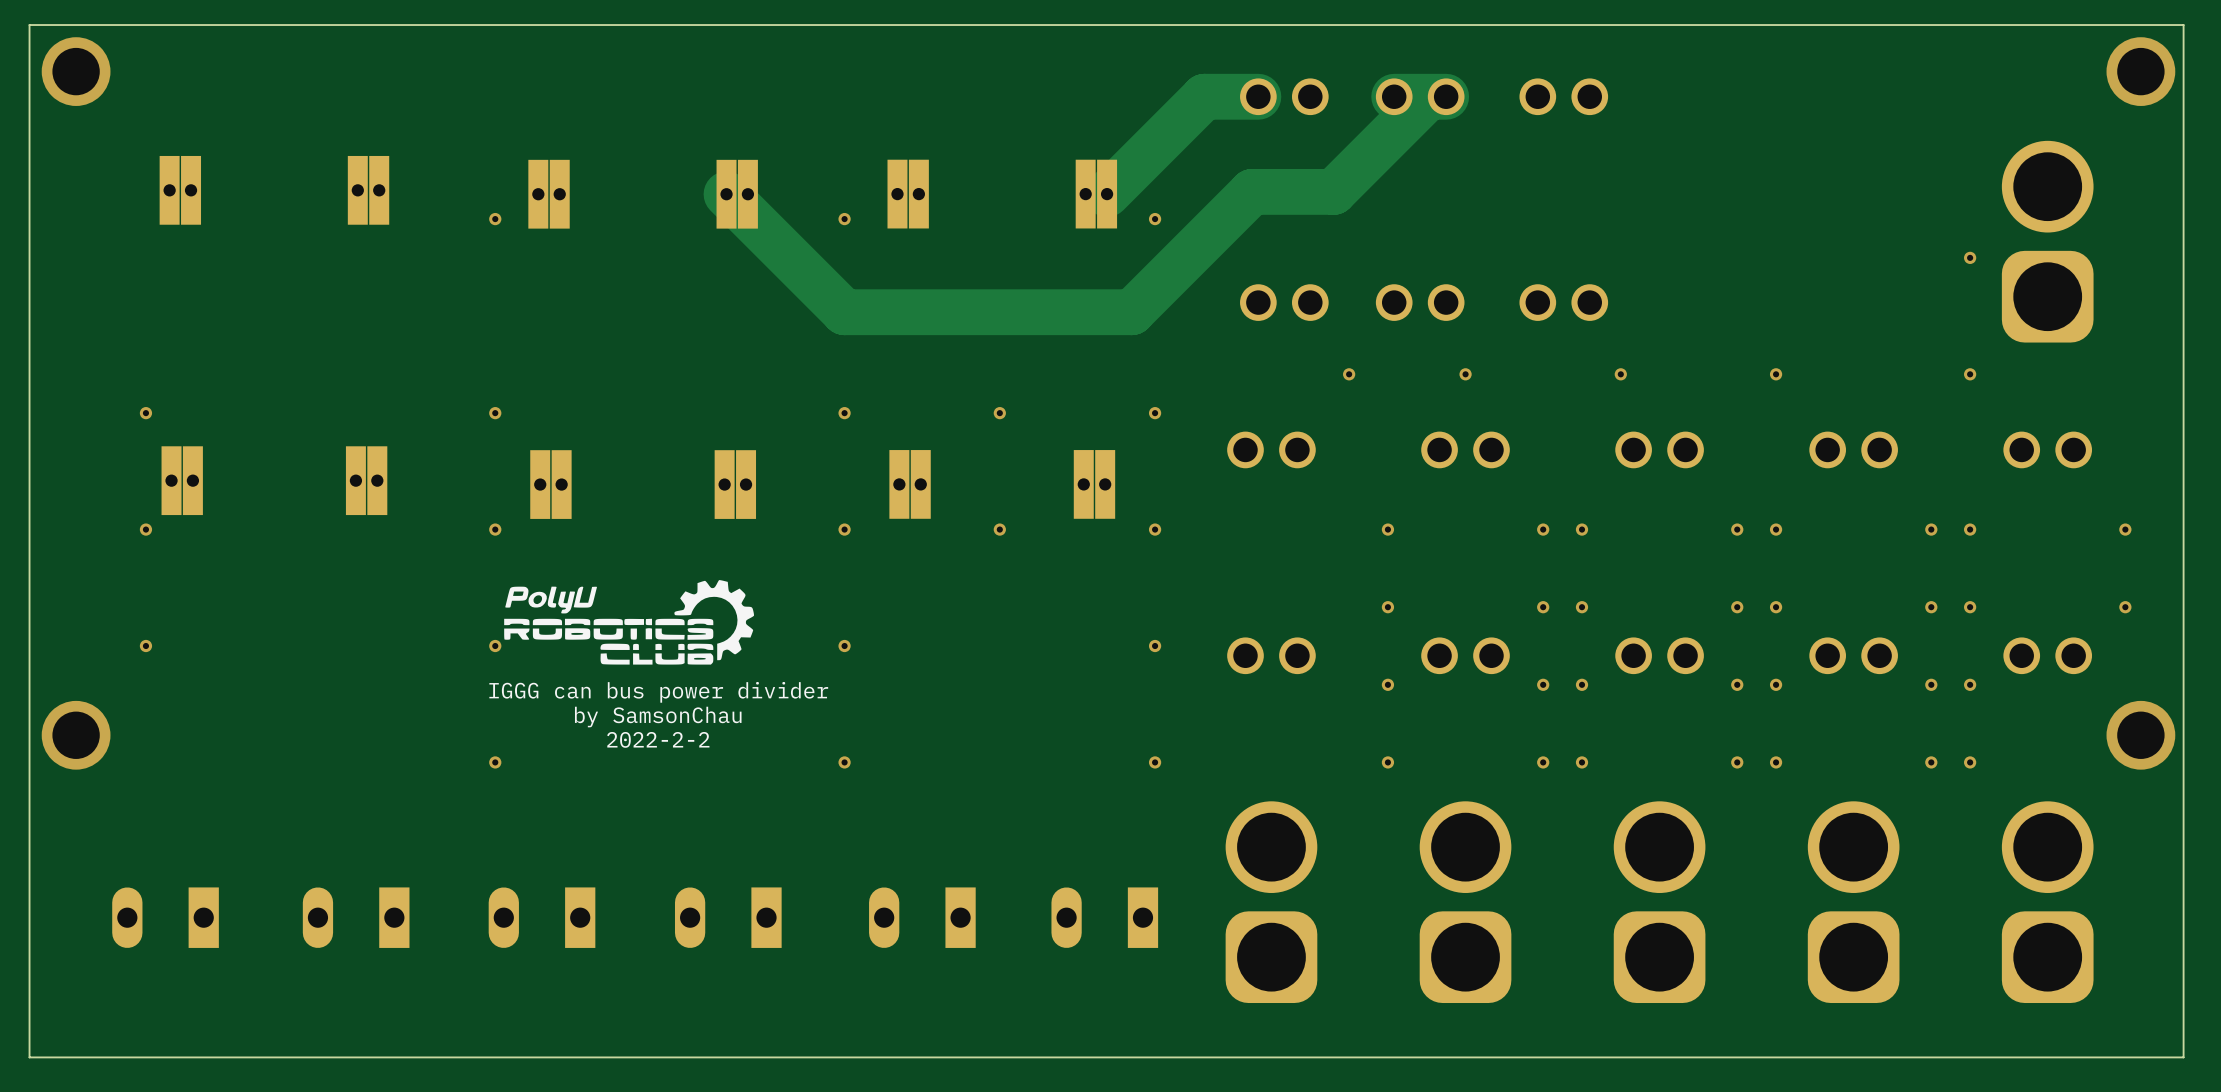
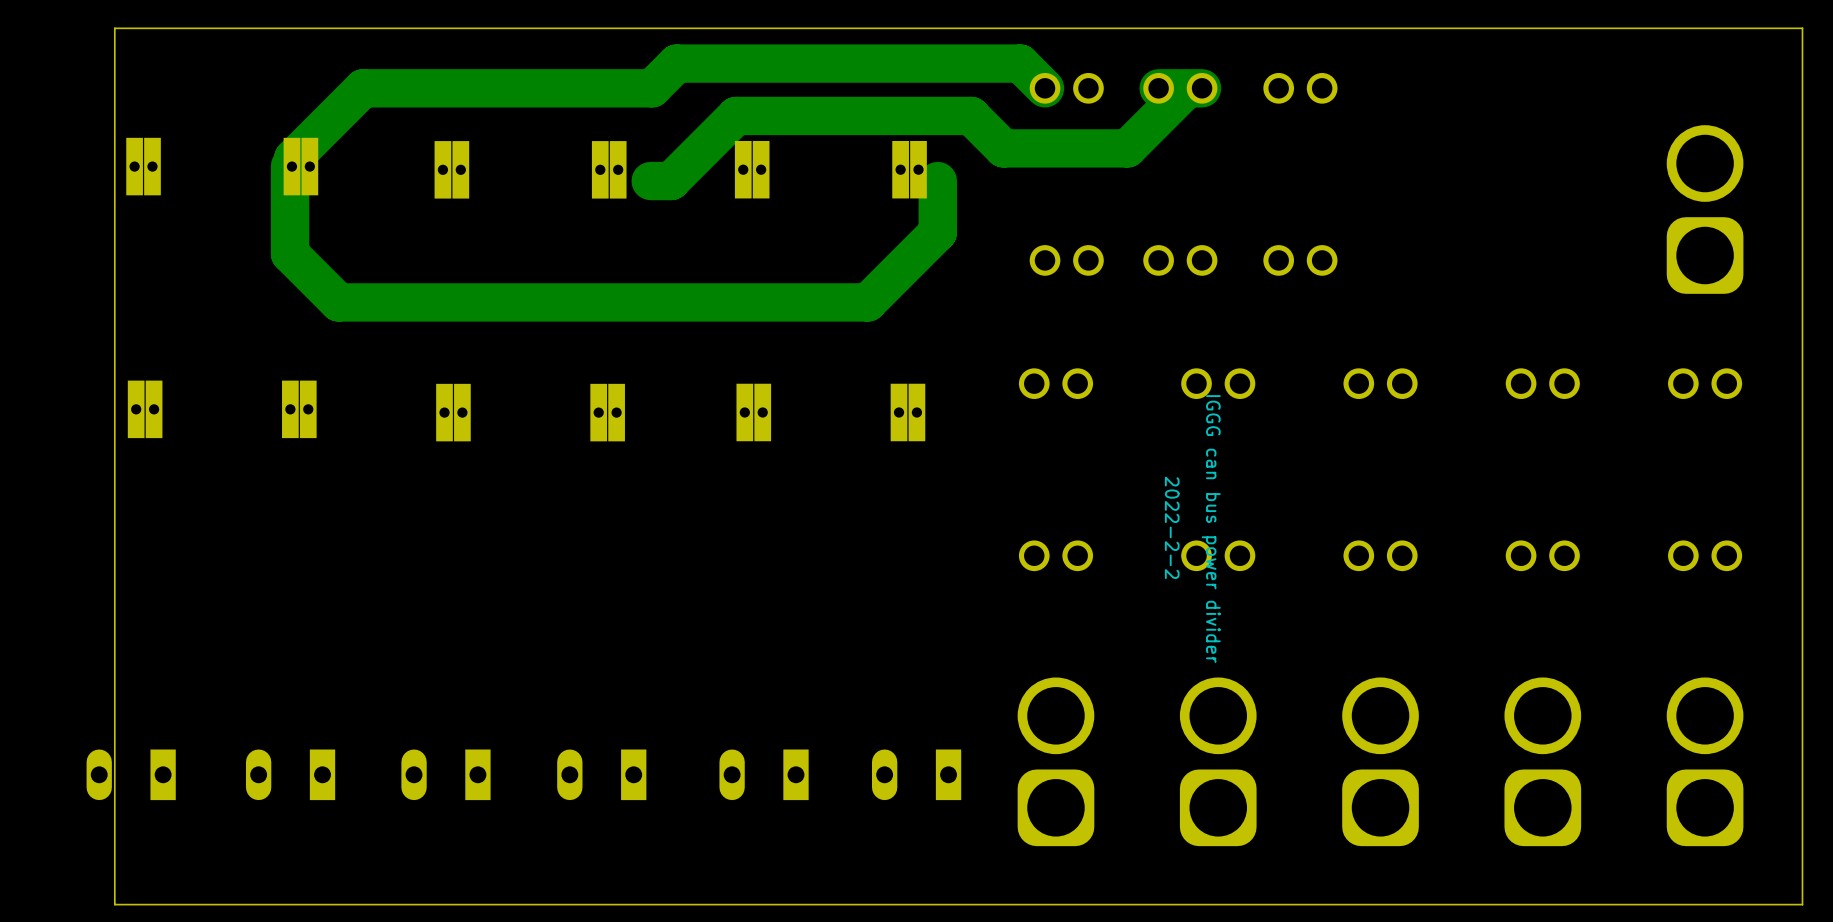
board edge: (2164, 25) (2183, 25) (2183, 1057) (29, 1057) (29, 25) (145, 25) -> (1802, 28) (1802, 904) (114, 904) (114, 28)
via: (76, 71) -> none
via: (2140, 71) -> none
track: (1258, 96) (1204, 96) (1107, 194) -> (1045, 88) (1020, 63) (676, 63) (651, 88) (363, 88) (293, 158) (293, 171)
track: (1356, 168) (1333, 191) (1252, 191) (1131, 312) (844, 312) (726, 194) -> (1127, 148) (1003, 148) (971, 115) (736, 115) (671, 181) (650, 181)
track: none -> (290, 166) (290, 253) (338, 302) (867, 302) (937, 232) (937, 181)
via: (495, 219) -> none
via: (844, 219) -> none
via: (1155, 219) -> none
via: (1970, 257) -> none
via: (1349, 374) -> none
via: (1465, 374) -> none
via: (1620, 374) -> none
via: (1776, 374) -> none
via: (1970, 374) -> none
via: (145, 413) -> none
via: (495, 413) -> none
via: (844, 413) -> none
via: (999, 413) -> none
via: (1155, 413) -> none
via: (145, 529) -> none
via: (495, 529) -> none
via: (844, 529) -> none
via: (999, 529) -> none
via: (1155, 529) -> none
via: (1387, 529) -> none
via: (1543, 529) -> none
via: (1582, 529) -> none
via: (1737, 529) -> none
via: (1776, 529) -> none
via: (1931, 529) -> none
via: (1970, 529) -> none
via: (2125, 529) -> none
drawing: [504, 580, 755, 665] -> none
via: (1387, 607) -> none
via: (1543, 607) -> none
via: (1582, 607) -> none
via: (1737, 607) -> none
via: (1776, 607) -> none
via: (1931, 607) -> none
via: (1970, 607) -> none
via: (2125, 607) -> none
text: none -> 2022-2-2 (1172, 527)
text: none -> IGGG can bus power divider (1211, 529)
via: (145, 646) -> none
via: (495, 646) -> none
via: (844, 646) -> none
via: (1155, 646) -> none
via: (1387, 684) -> none
via: (1543, 684) -> none
via: (1582, 684) -> none
via: (1737, 684) -> none
via: (1776, 684) -> none
via: (1931, 684) -> none
via: (1970, 684) -> none
text: IGGG can bus power divider (658, 692) -> none
text: by SamsonChau (658, 717) -> none
via: (76, 735) -> none
via: (2140, 735) -> none
text: 2022-2-2 (658, 739) -> none
via: (495, 762) -> none
via: (844, 762) -> none
via: (1155, 762) -> none
via: (1387, 762) -> none
via: (1543, 762) -> none
via: (1582, 762) -> none
via: (1737, 762) -> none
via: (1776, 762) -> none
via: (1931, 762) -> none
via: (1970, 762) -> none

